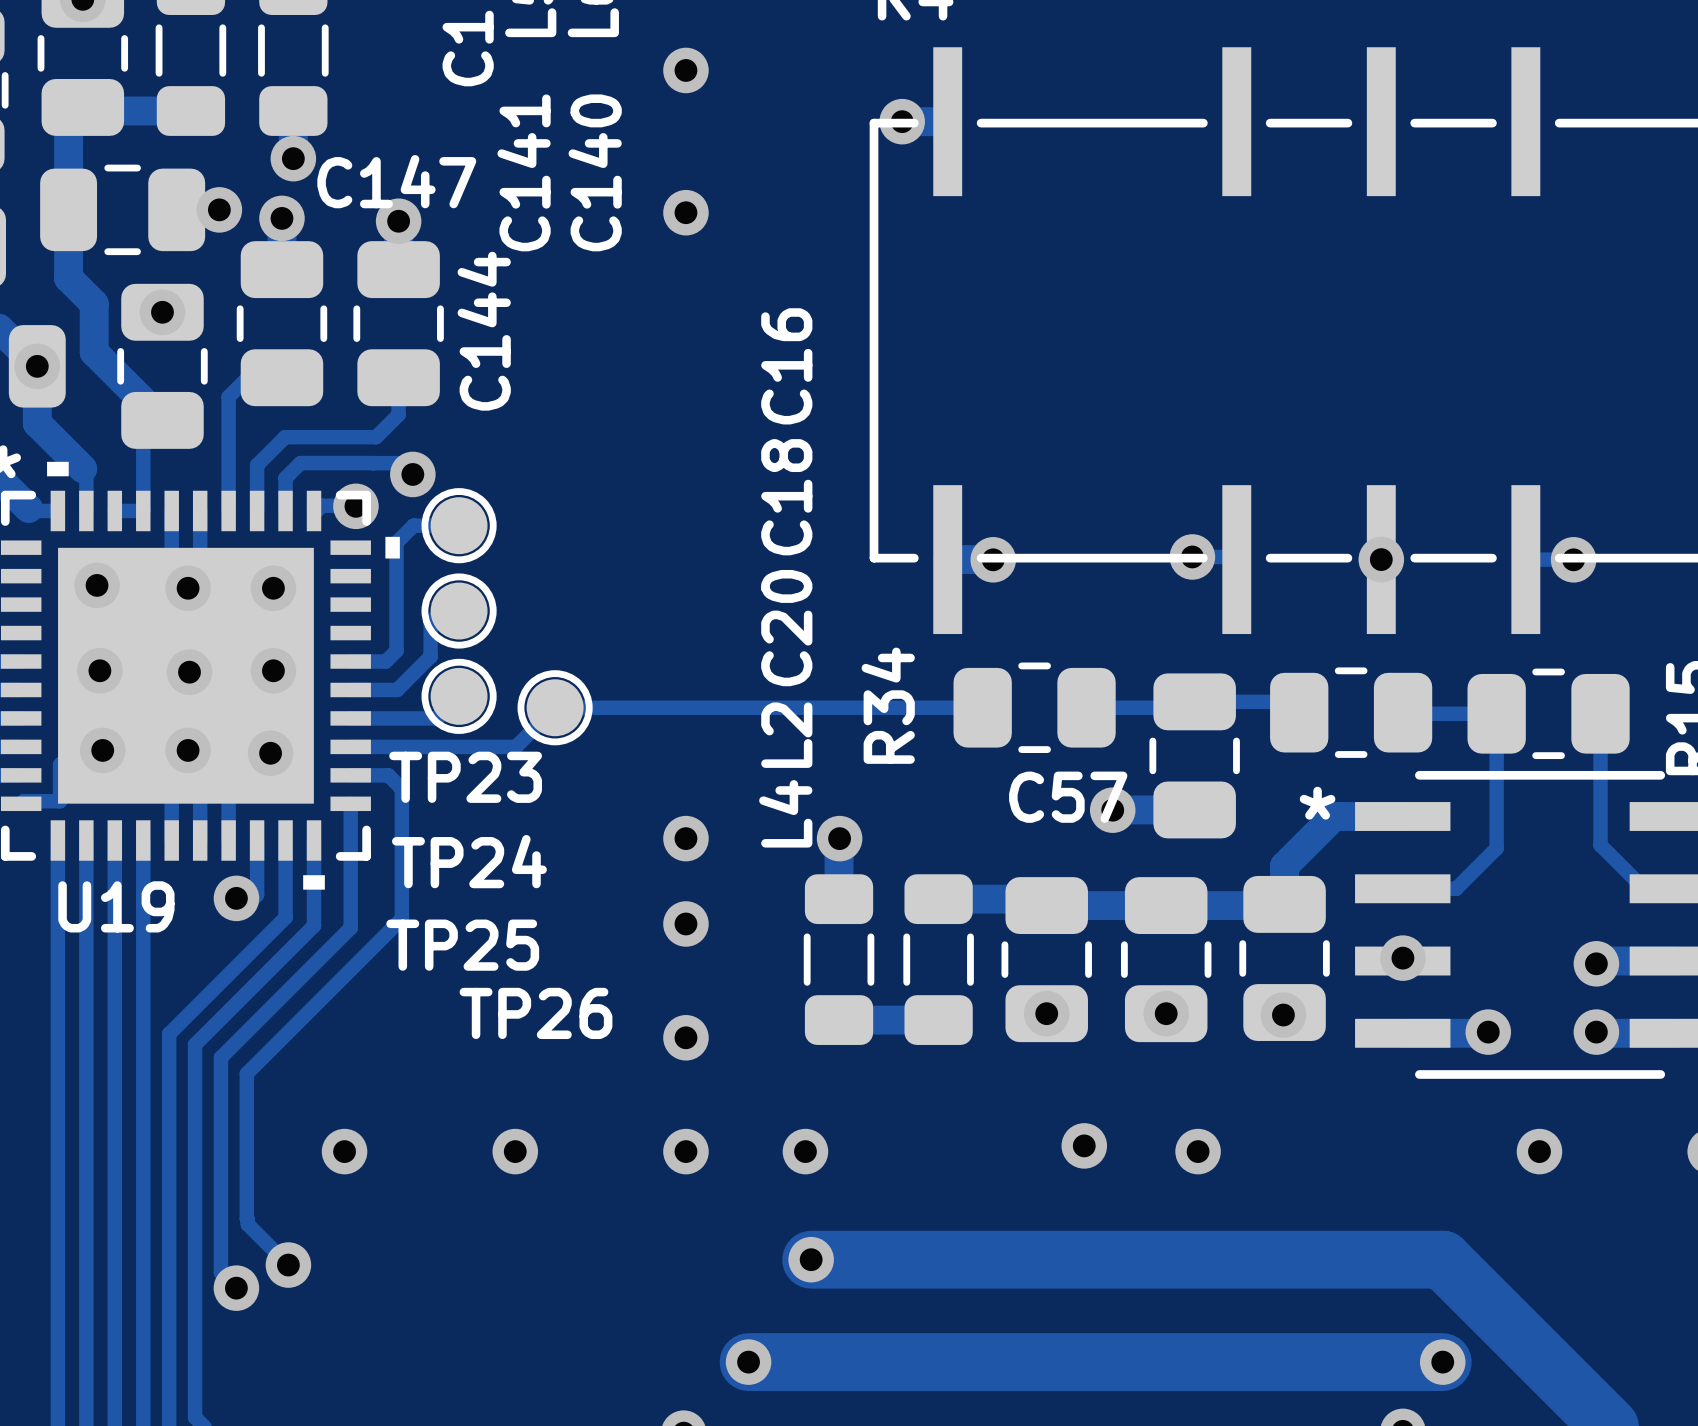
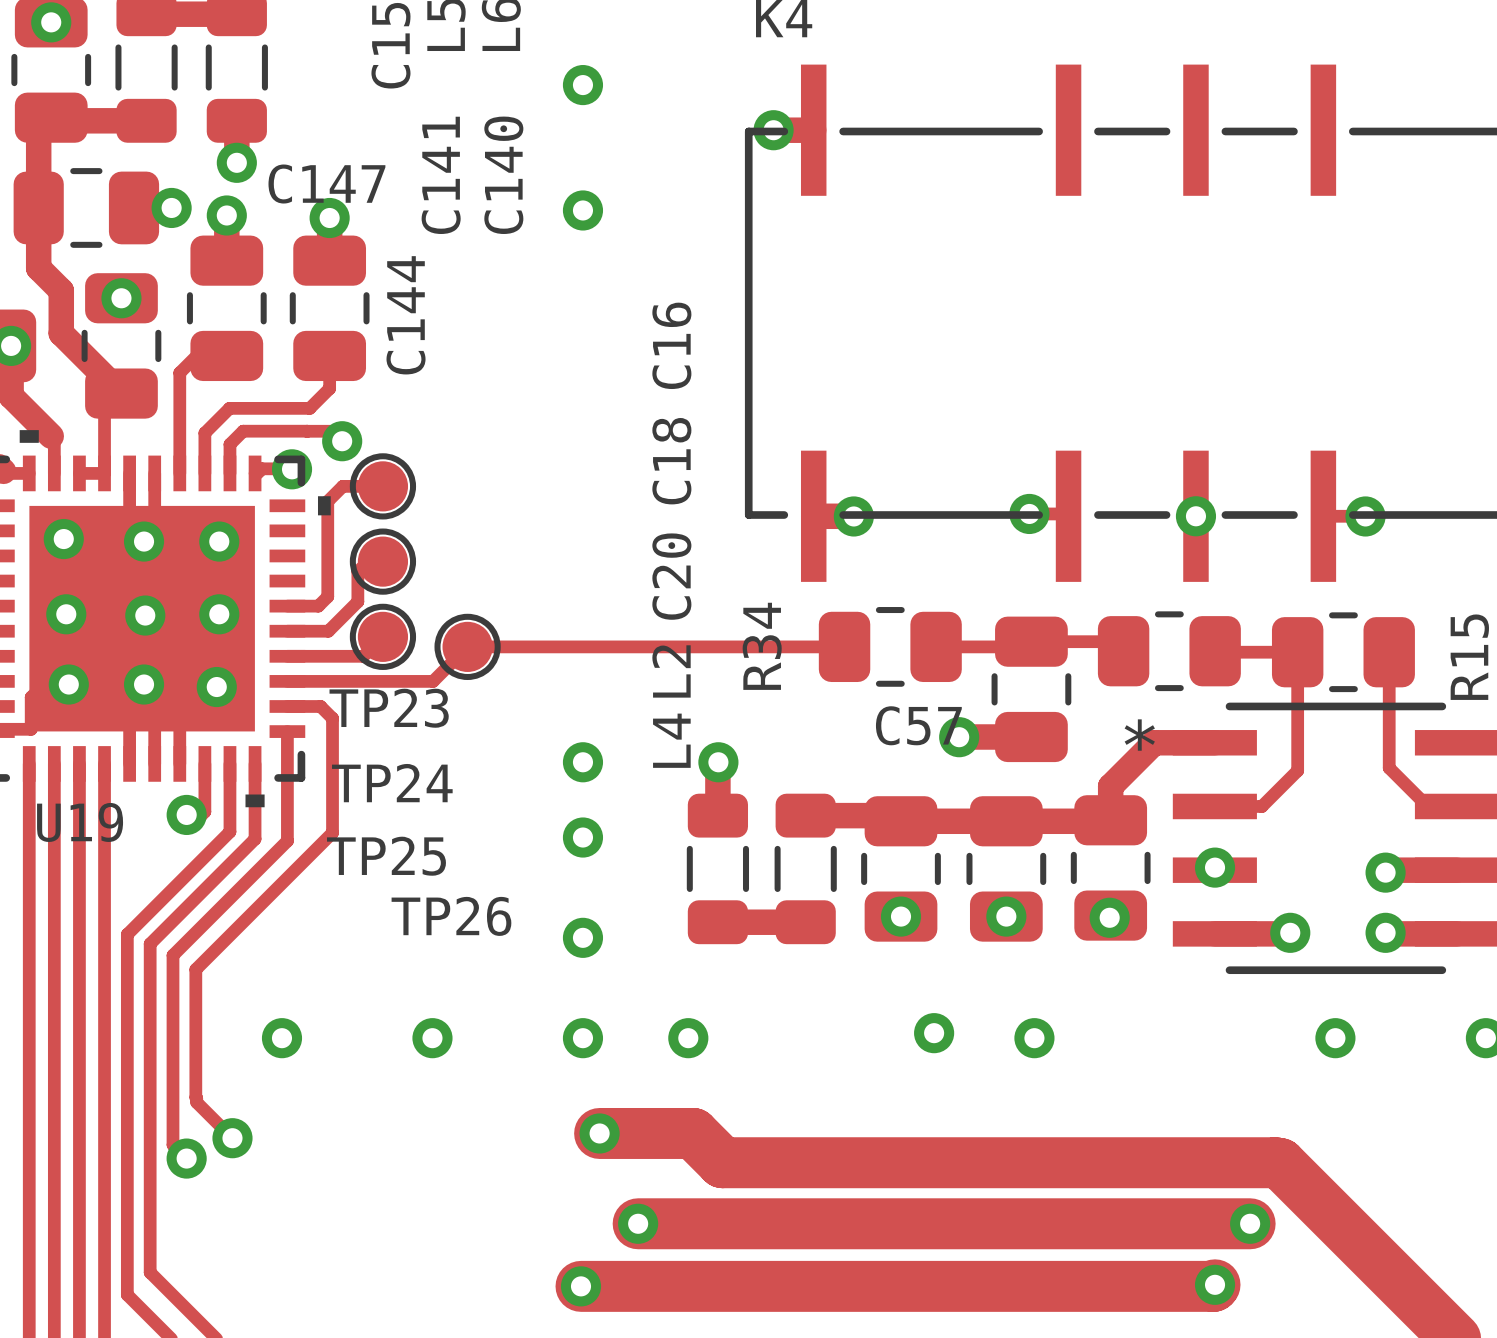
track: (811, 1259) (1442, 1259) (1476, 1293) -> (599, 1133) (693, 1133) (722, 1162) (1280, 1163)
via position: (811, 1259) -> (599, 1133)

